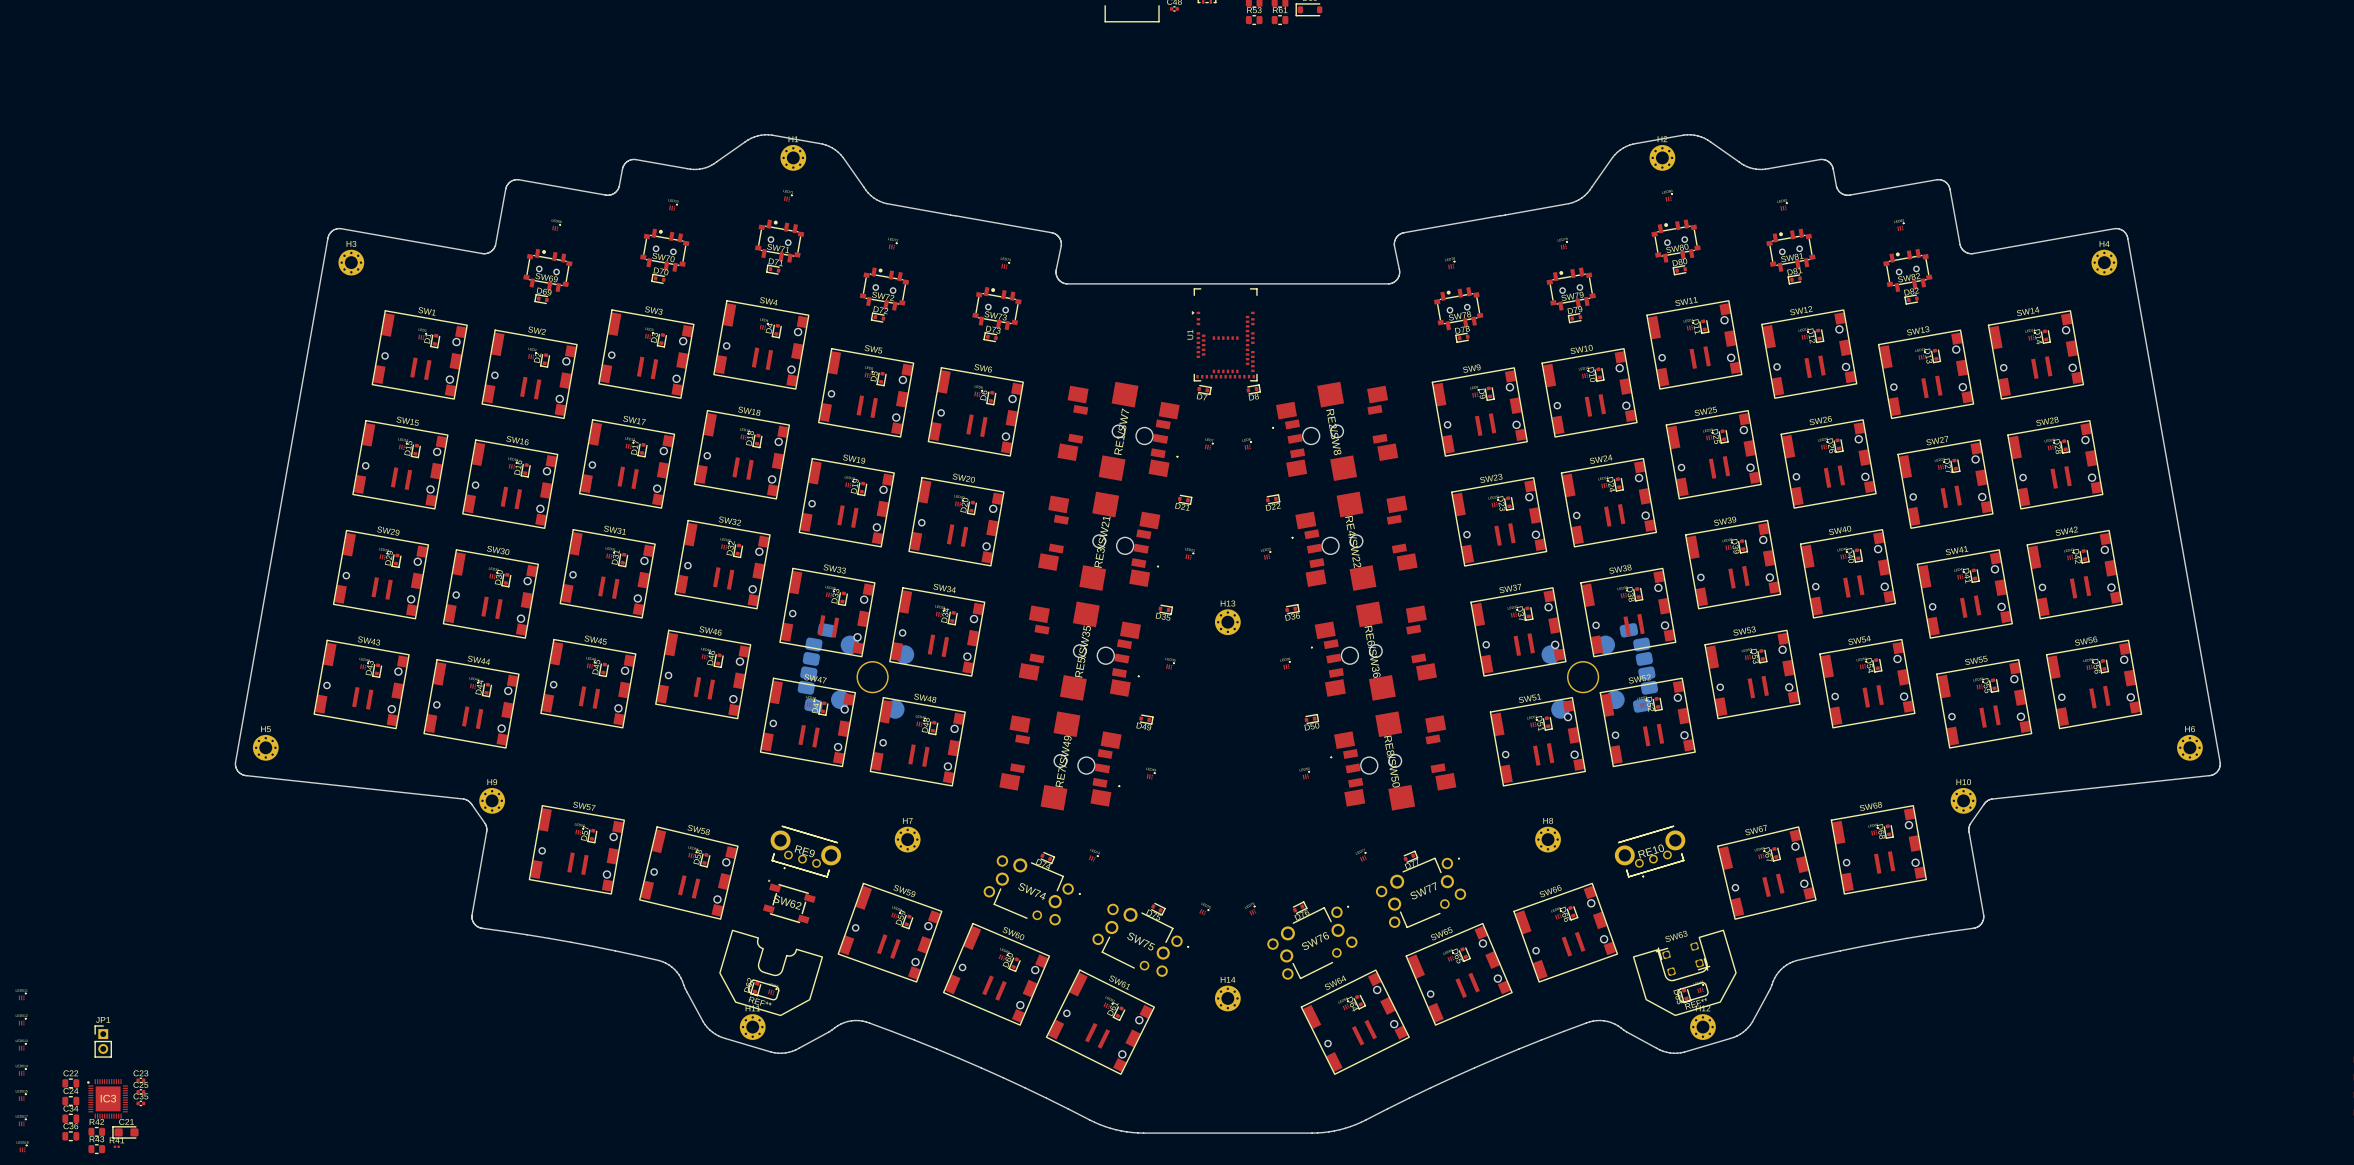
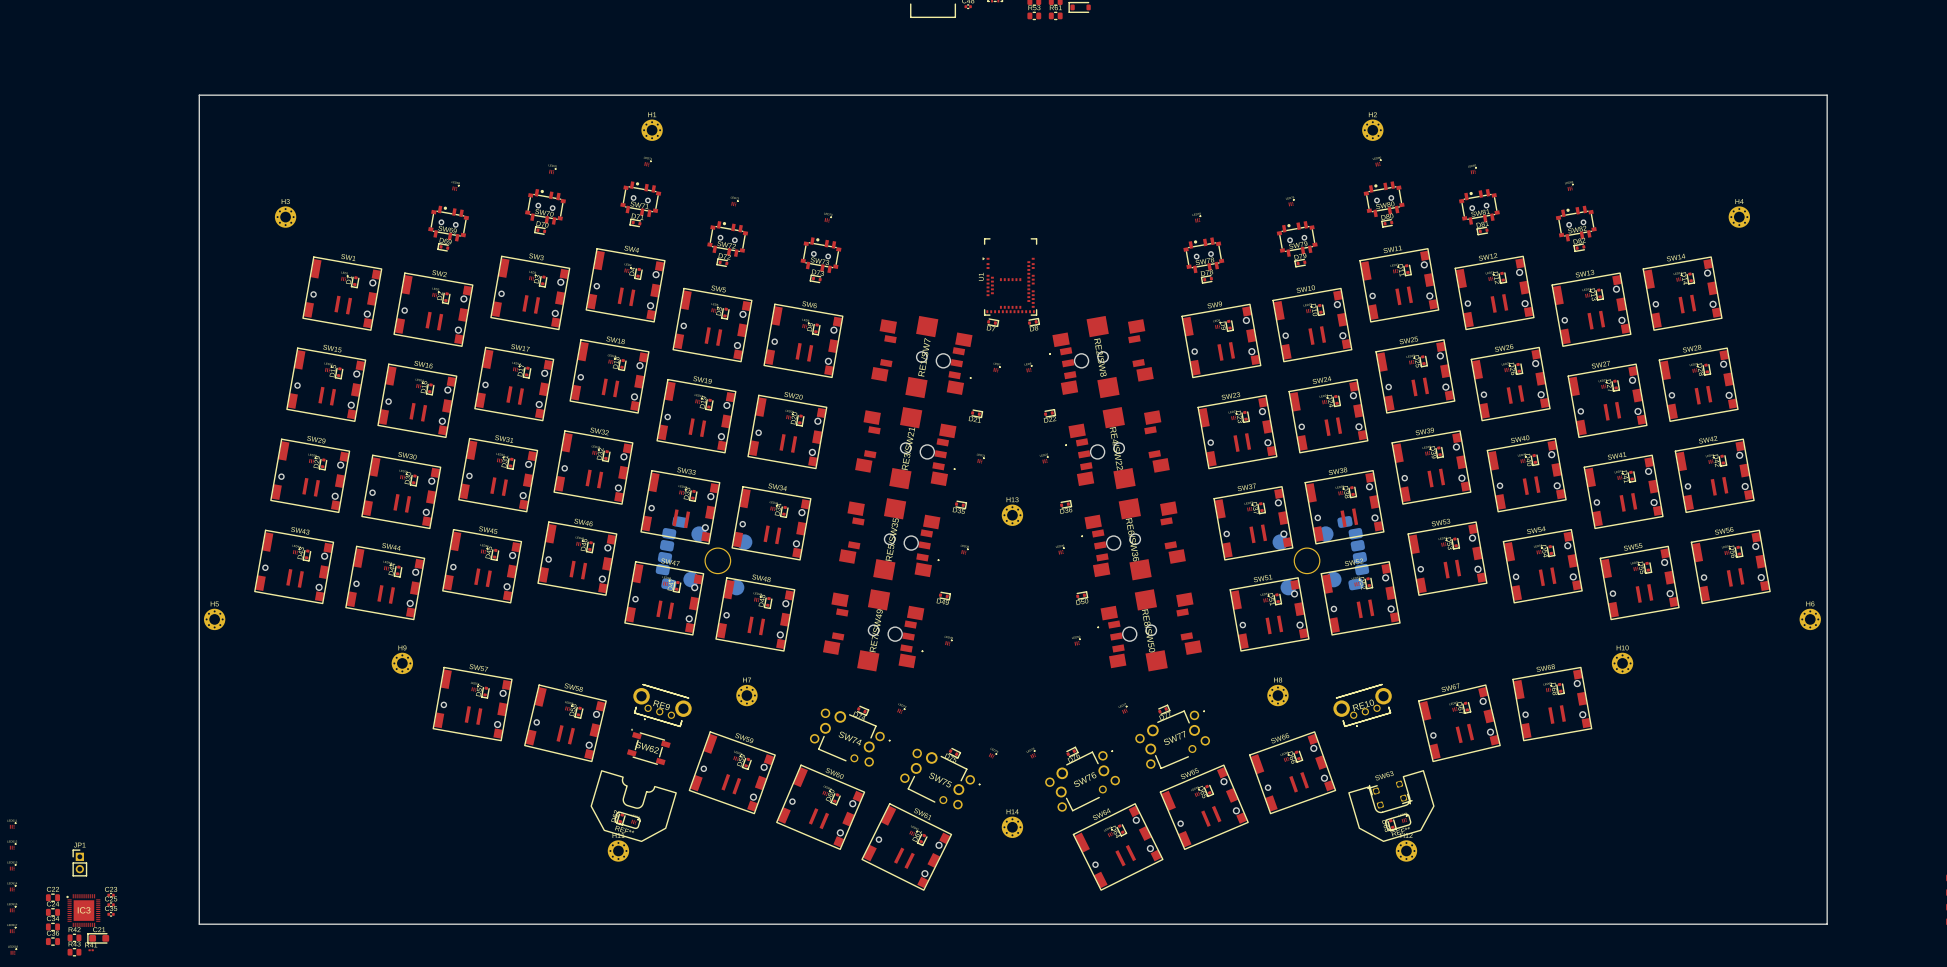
board edge: (768, 134) (751, 138) (714, 163) (699, 169) (635, 159) (629, 160) (623, 166) (618, 189) (609, 195) (518, 179) (512, 180) (505, 188) (495, 246) (491, 251) (486, 253) (340, 228) (334, 229) (330, 233) (235, 762) (238, 771) (245, 775) (467, 800) (485, 823) (486, 829) (471, 915) (475, 925) (481, 928) (593, 946) (665, 963) (679, 975) (705, 1024) (718, 1036) (771, 1052) (785, 1052) (795, 1049) (844, 1022) (862, 1021) (959, 1058) (1094, 1122) (1115, 1129) (1143, 1133) (1312, 1133) (1334, 1130) (1361, 1122) (1496, 1058) (1589, 1021) (1600, 1020) (1611, 1022) (1659, 1049) (1670, 1052) (1684, 1052) (1733, 1037) (1743, 1032) (1750, 1024) (1776, 975) (1789, 963) (1862, 946) (1974, 928) (1980, 925) (1983, 915) (1968, 829) (1970, 823) (1988, 800) (2210, 775) (2216, 772) (2219, 768) (2220, 762) (2127, 238) (2125, 233) (2120, 229) (2114, 228) (1969, 253) (1964, 251) (1960, 246) (1949, 188) (1943, 180) (1937, 179) (1845, 195) (1837, 189) (1832, 166) (1826, 160) (1820, 159) (1755, 169) (1741, 163) (1704, 138) (1687, 134) (1633, 144) (1623, 148) (1612, 157) (1587, 193) (1572, 202) (1400, 233) (1394, 243) (1399, 275) (1395, 281) (1390, 283) (1066, 283) (1060, 281) (1056, 275) (1061, 243) (1054, 233) (883, 202) (868, 193) (843, 157) (832, 148) (822, 144) (768, 134) -> (199, 95) (199, 924) (1827, 924) (1827, 95) (199, 95)

